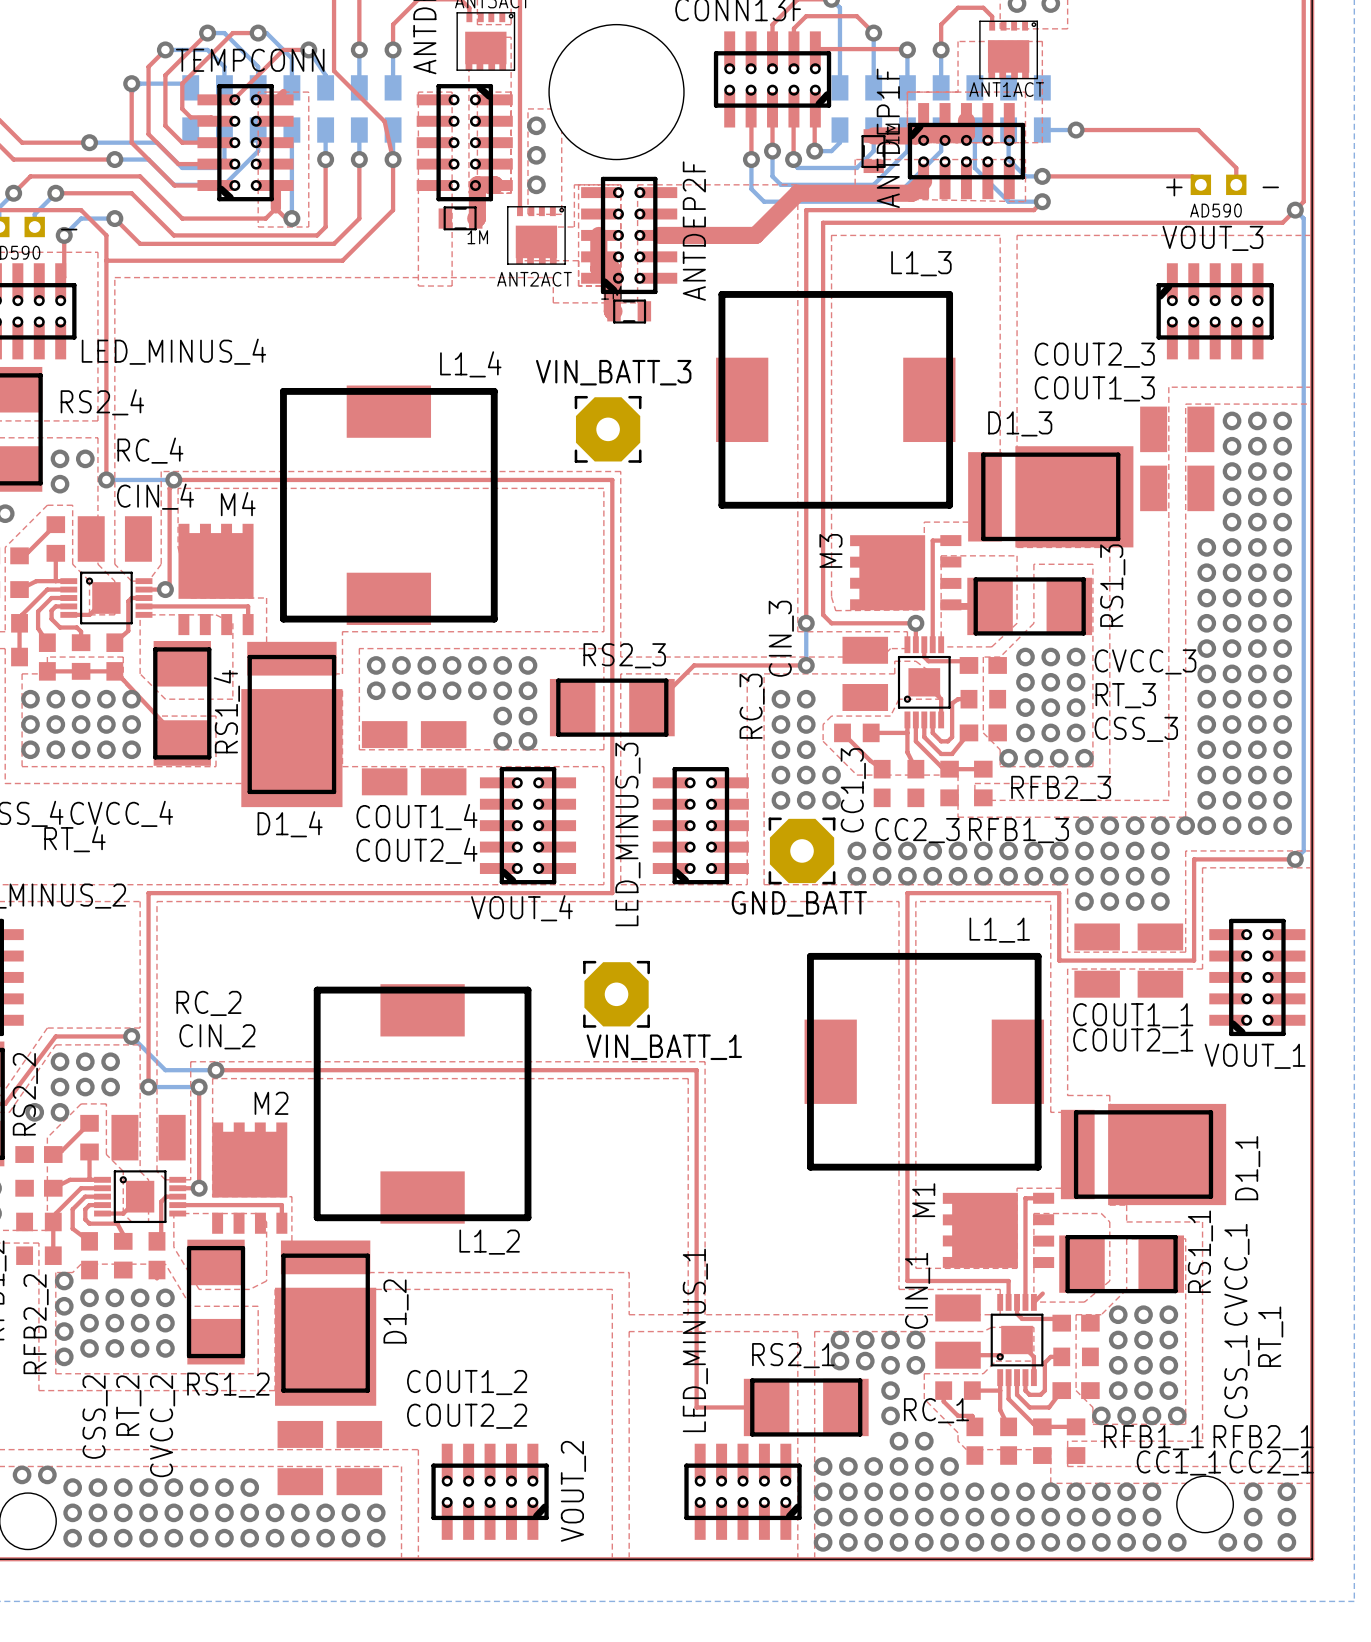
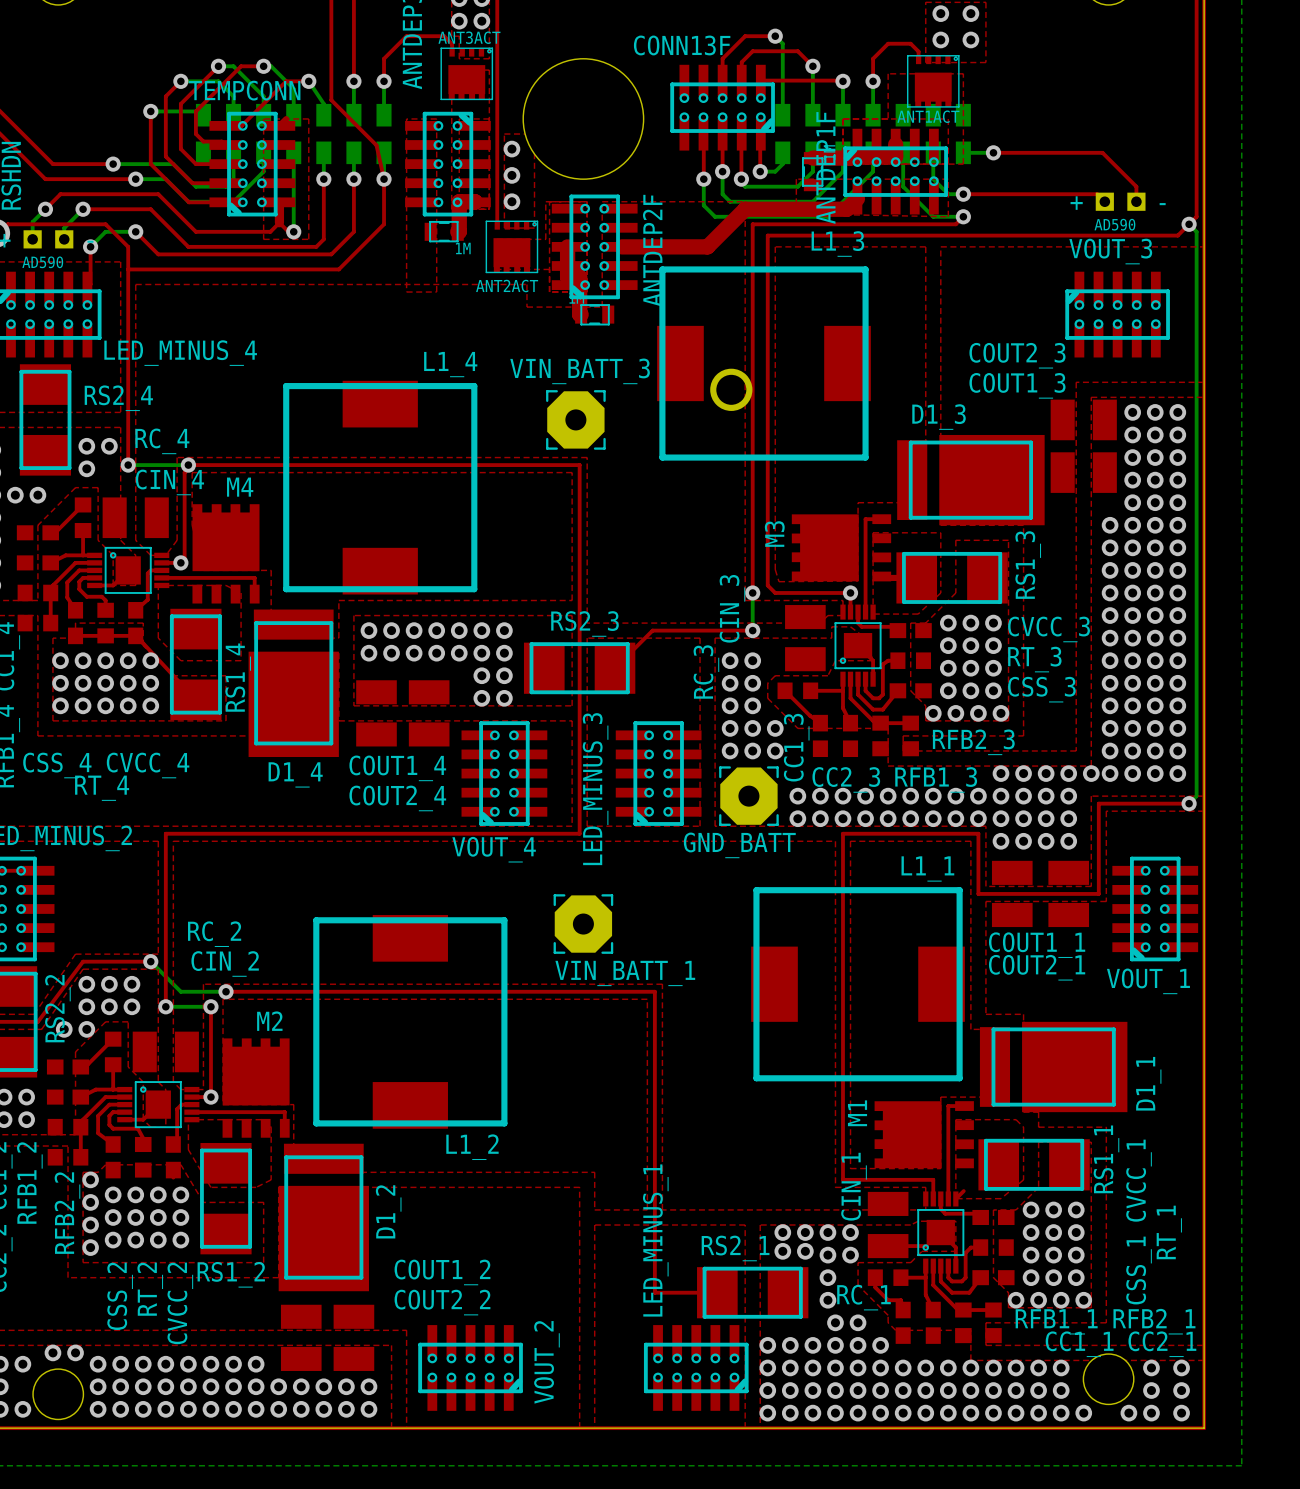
round board edge: none -> [710, 368, 753, 411]
L1_3 position: (835, 399) -> (763, 363)

